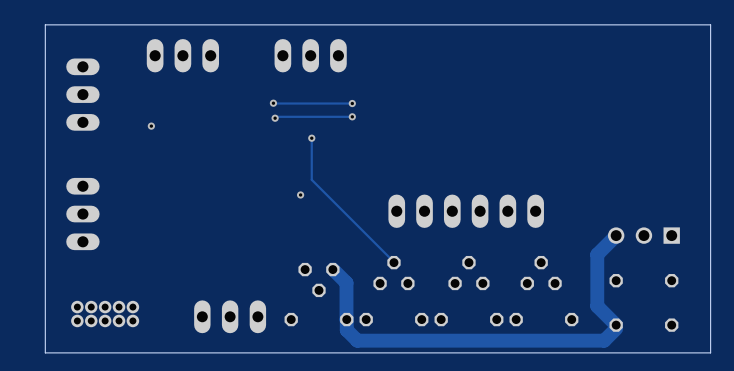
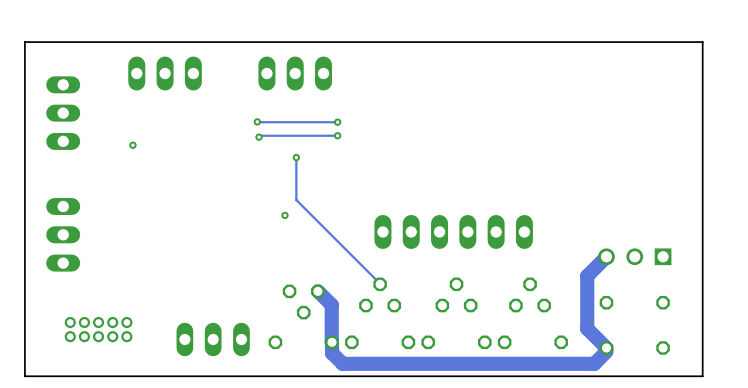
part: none -> (98, 329)
part: (105, 314) -> none

